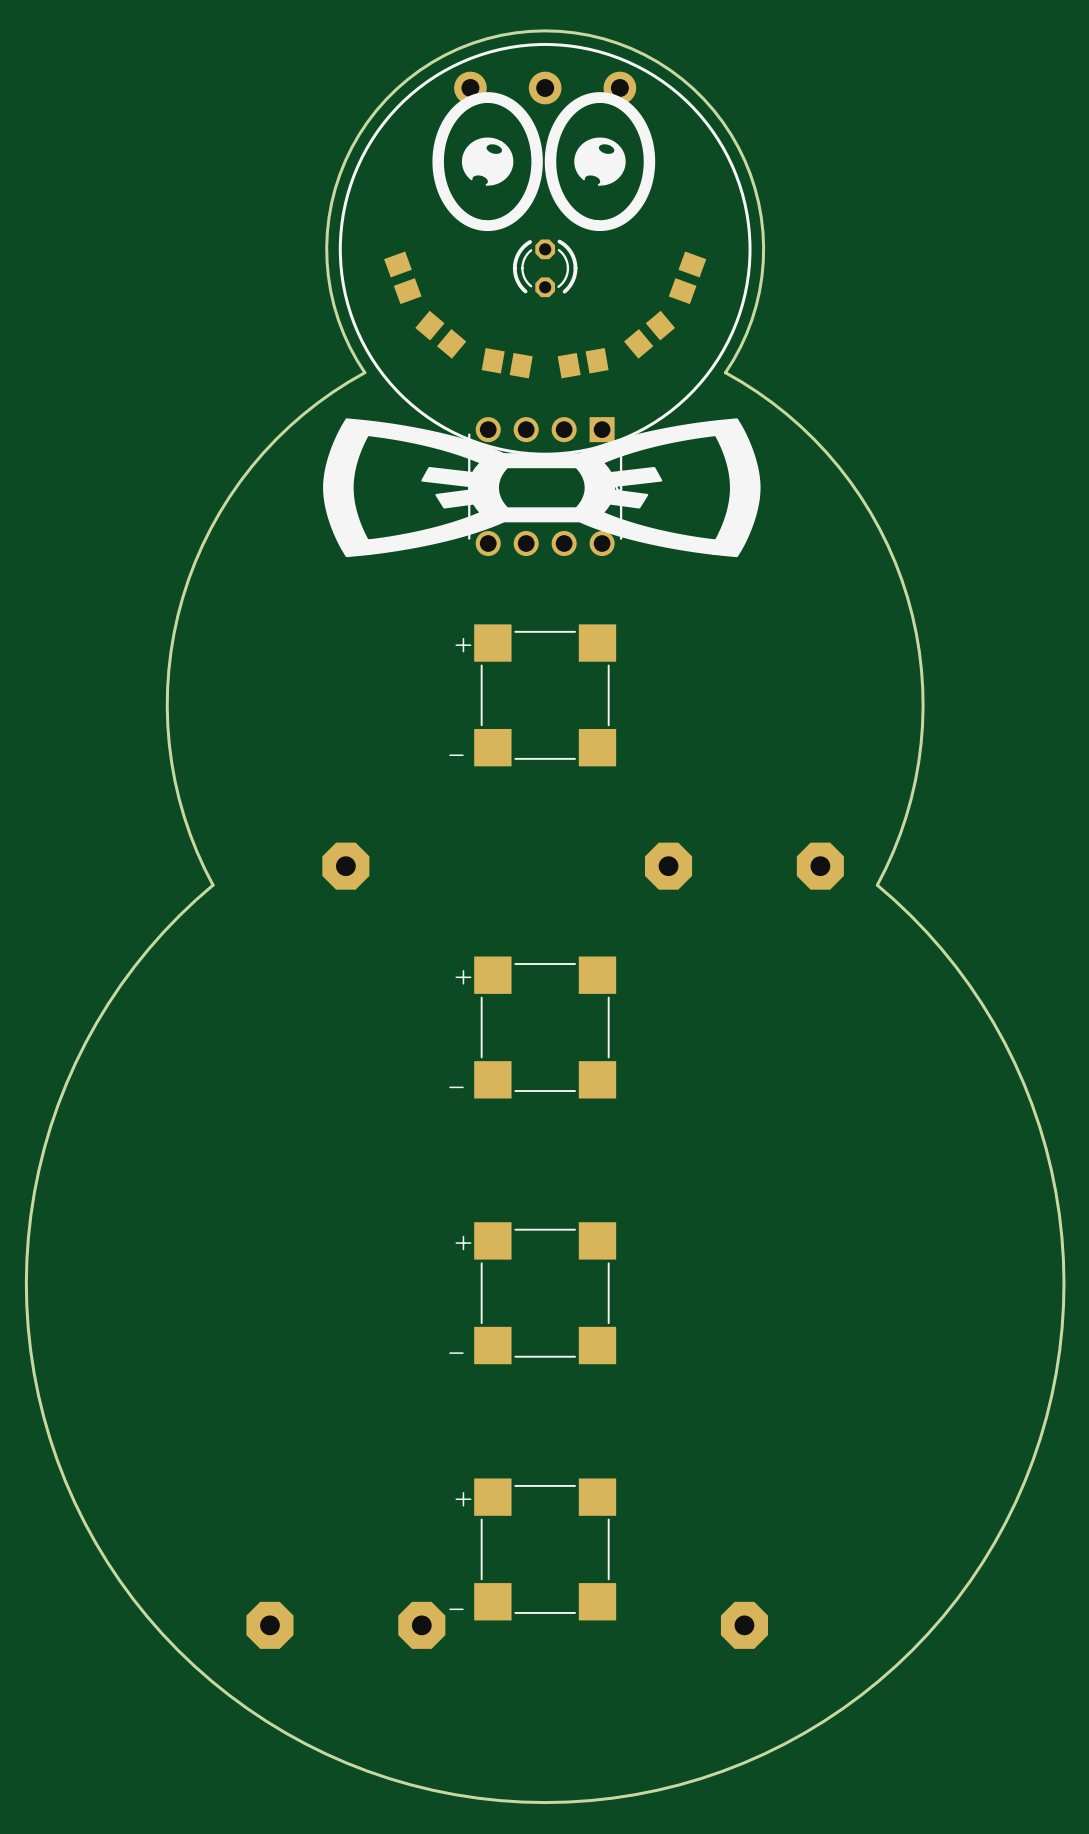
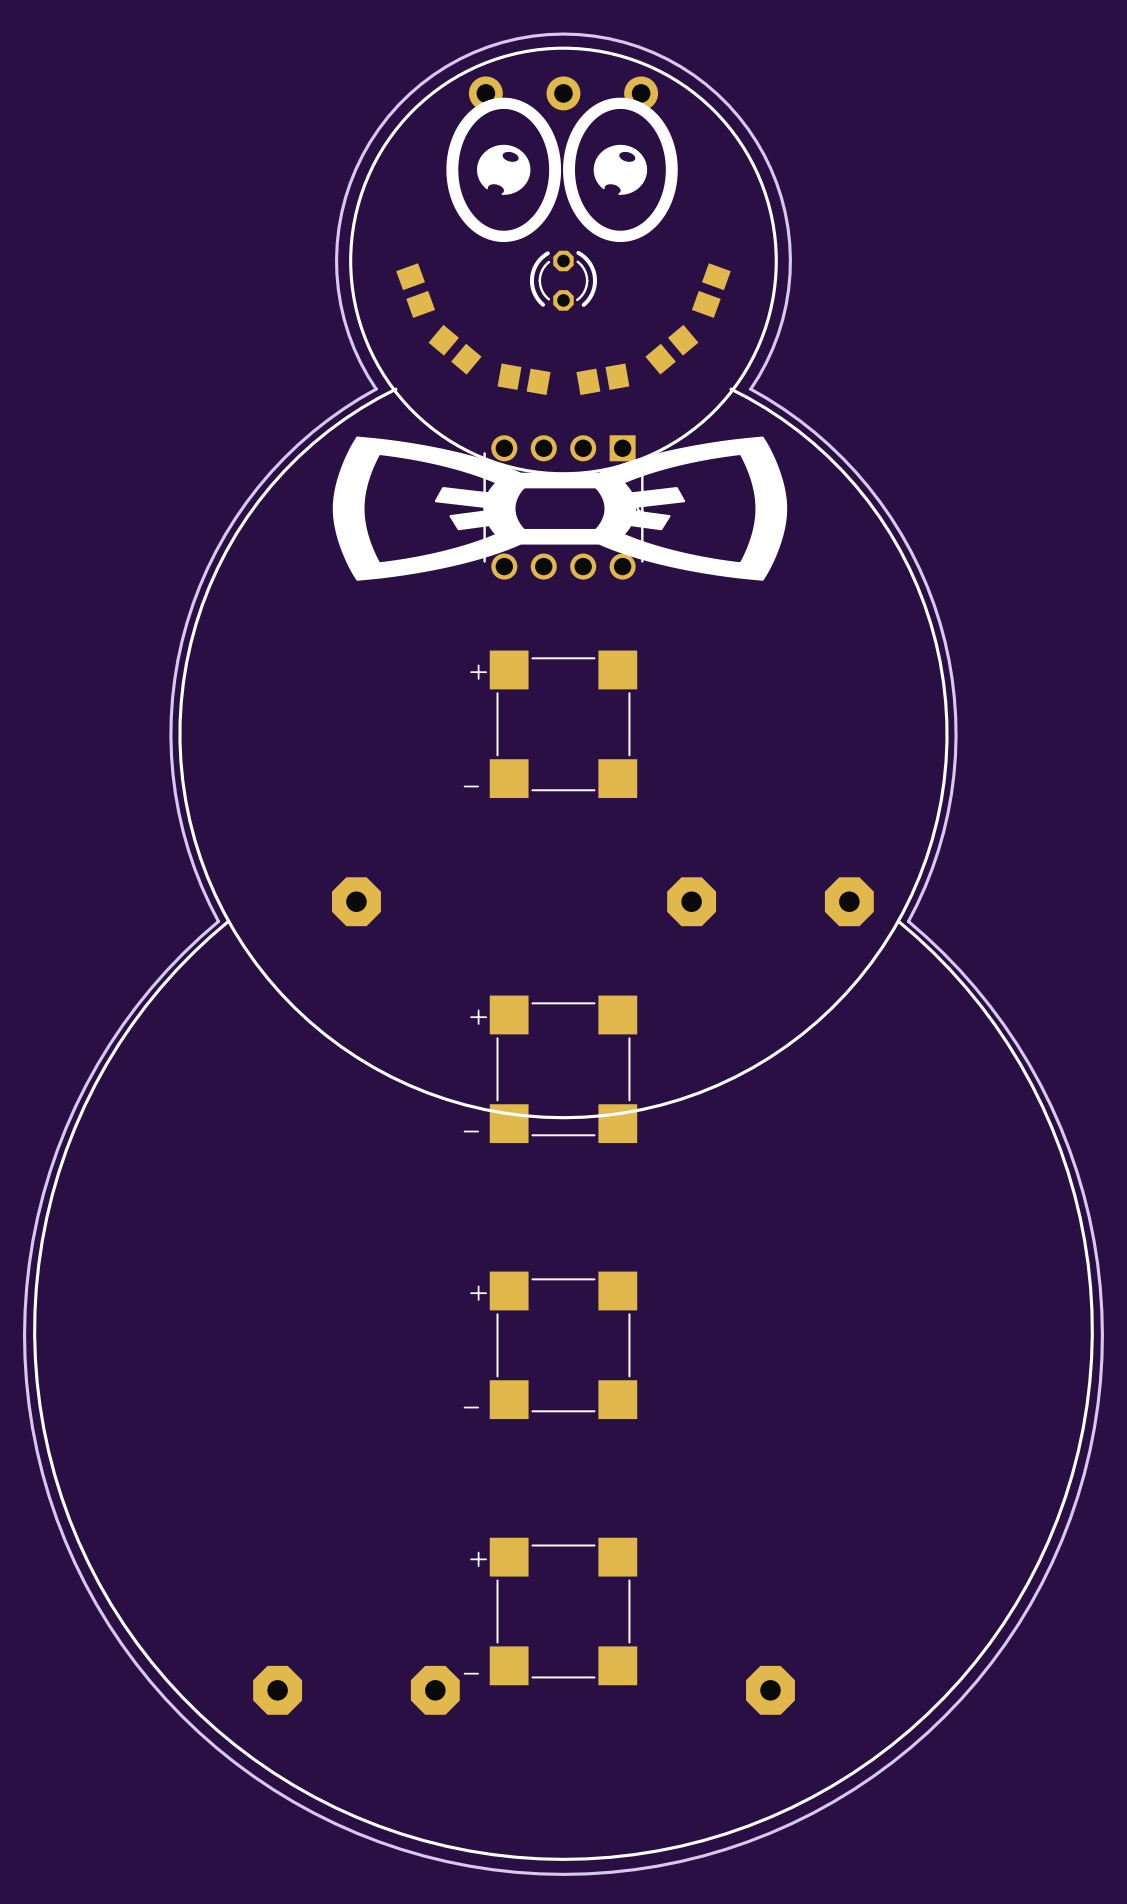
line: none -> (395, 389) (344, 419) (313, 443) (284, 470) (247, 517) (217, 568) (202, 605) (190, 643) (181, 701) (180, 761) (189, 820) (207, 876) (233, 930) (255, 963) (281, 993) (324, 1034) (356, 1057) (391, 1076) (446, 1099) (504, 1113) (563, 1117) (622, 1113) (680, 1099) (735, 1076) (770, 1057) (802, 1034) (845, 993) (871, 963) (893, 930) (919, 876) (937, 820) (946, 761) (945, 701) (936, 643) (924, 605) (909, 568) (879, 517) (842, 470) (813, 443) (782, 419) (731, 389)
line: none -> (228, 921) (193, 952) (160, 987) (118, 1044) (95, 1085) (75, 1127) (52, 1194) (38, 1264) (34, 1311) (35, 1358) (39, 1405) (48, 1451) (69, 1519) (88, 1562) (110, 1604) (151, 1662) (199, 1714) (235, 1745) (273, 1772) (335, 1807) (400, 1833) (469, 1850) (516, 1857) (563, 1859) (610, 1857) (657, 1850) (726, 1833) (791, 1807) (853, 1772) (891, 1745) (927, 1714) (975, 1662) (1015, 1604) (1038, 1562) (1057, 1519) (1078, 1451) (1086, 1405) (1091, 1358) (1091, 1311) (1088, 1264) (1074, 1194) (1051, 1127) (1031, 1085) (1008, 1044) (965, 987) (933, 952) (898, 921)

